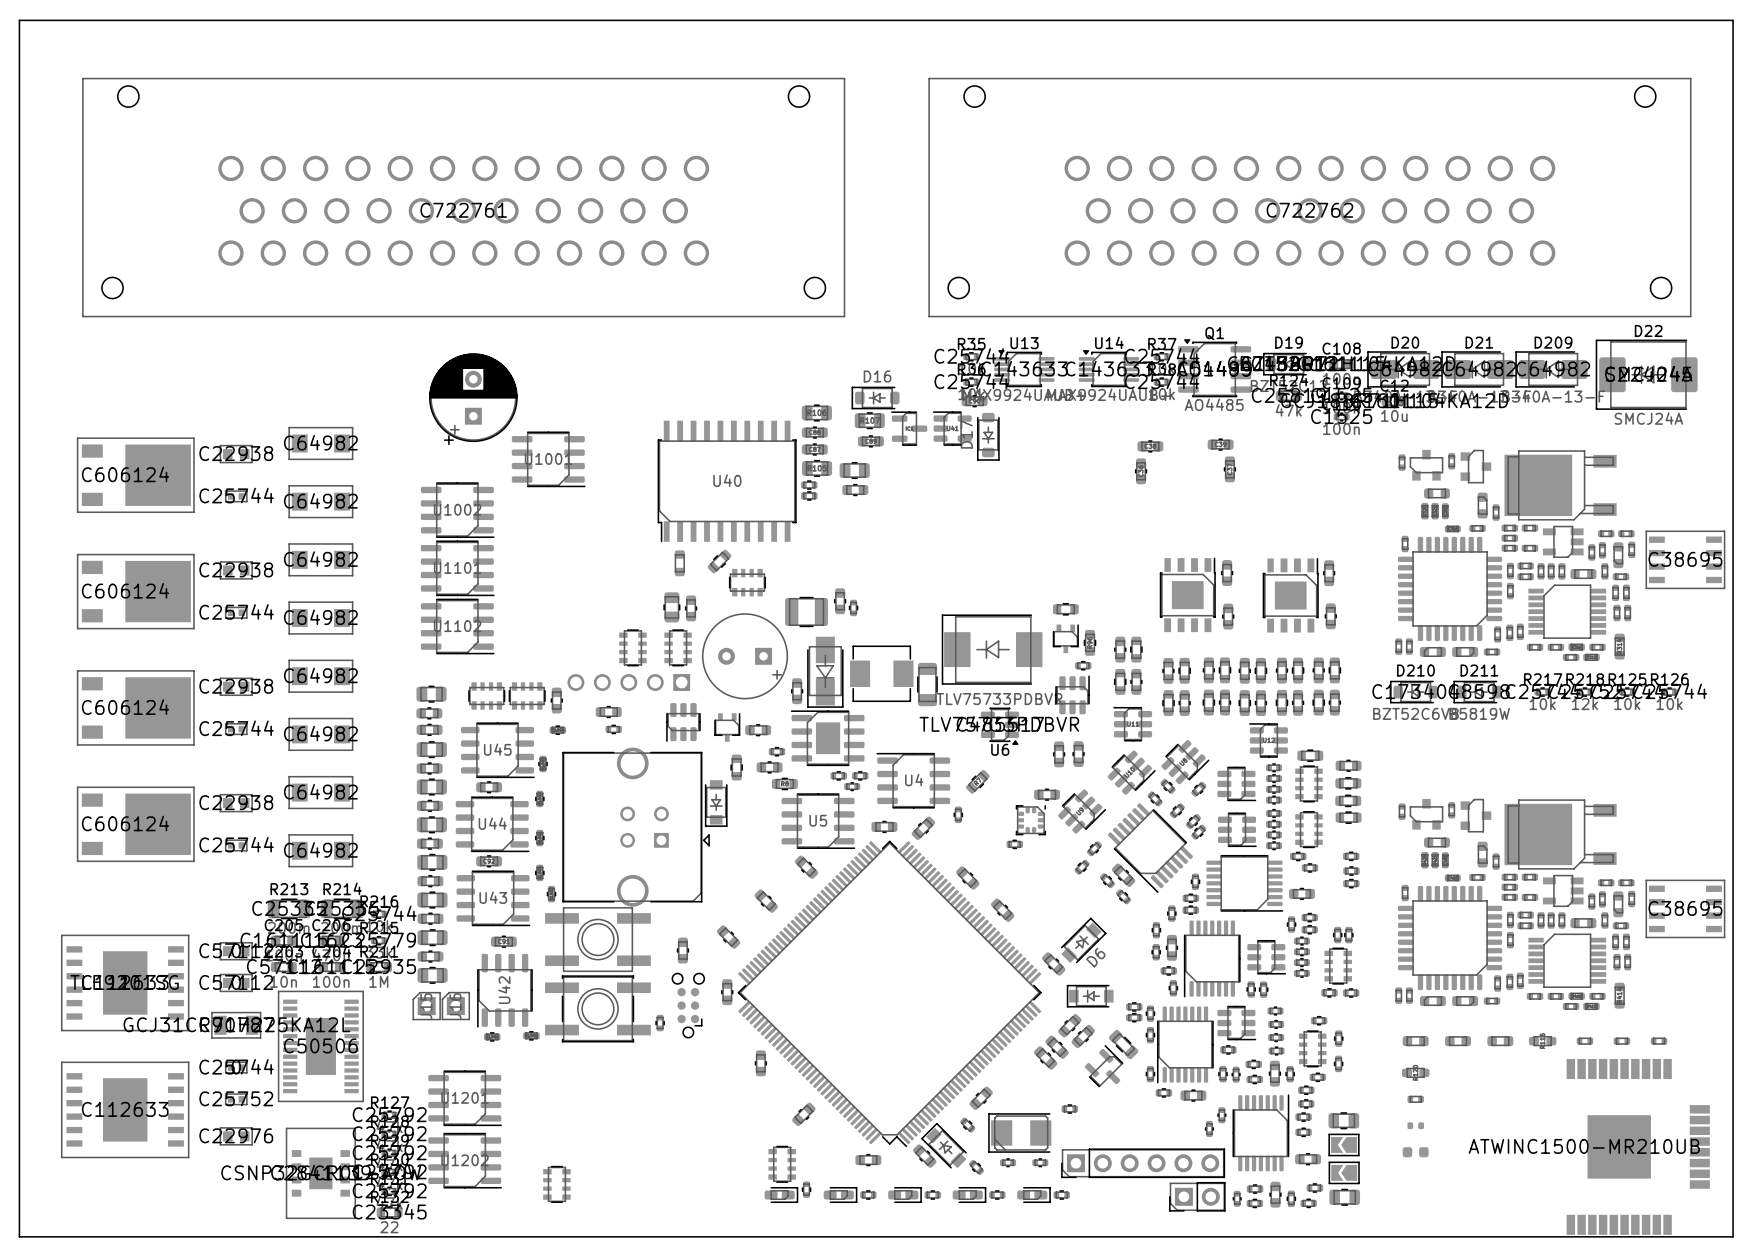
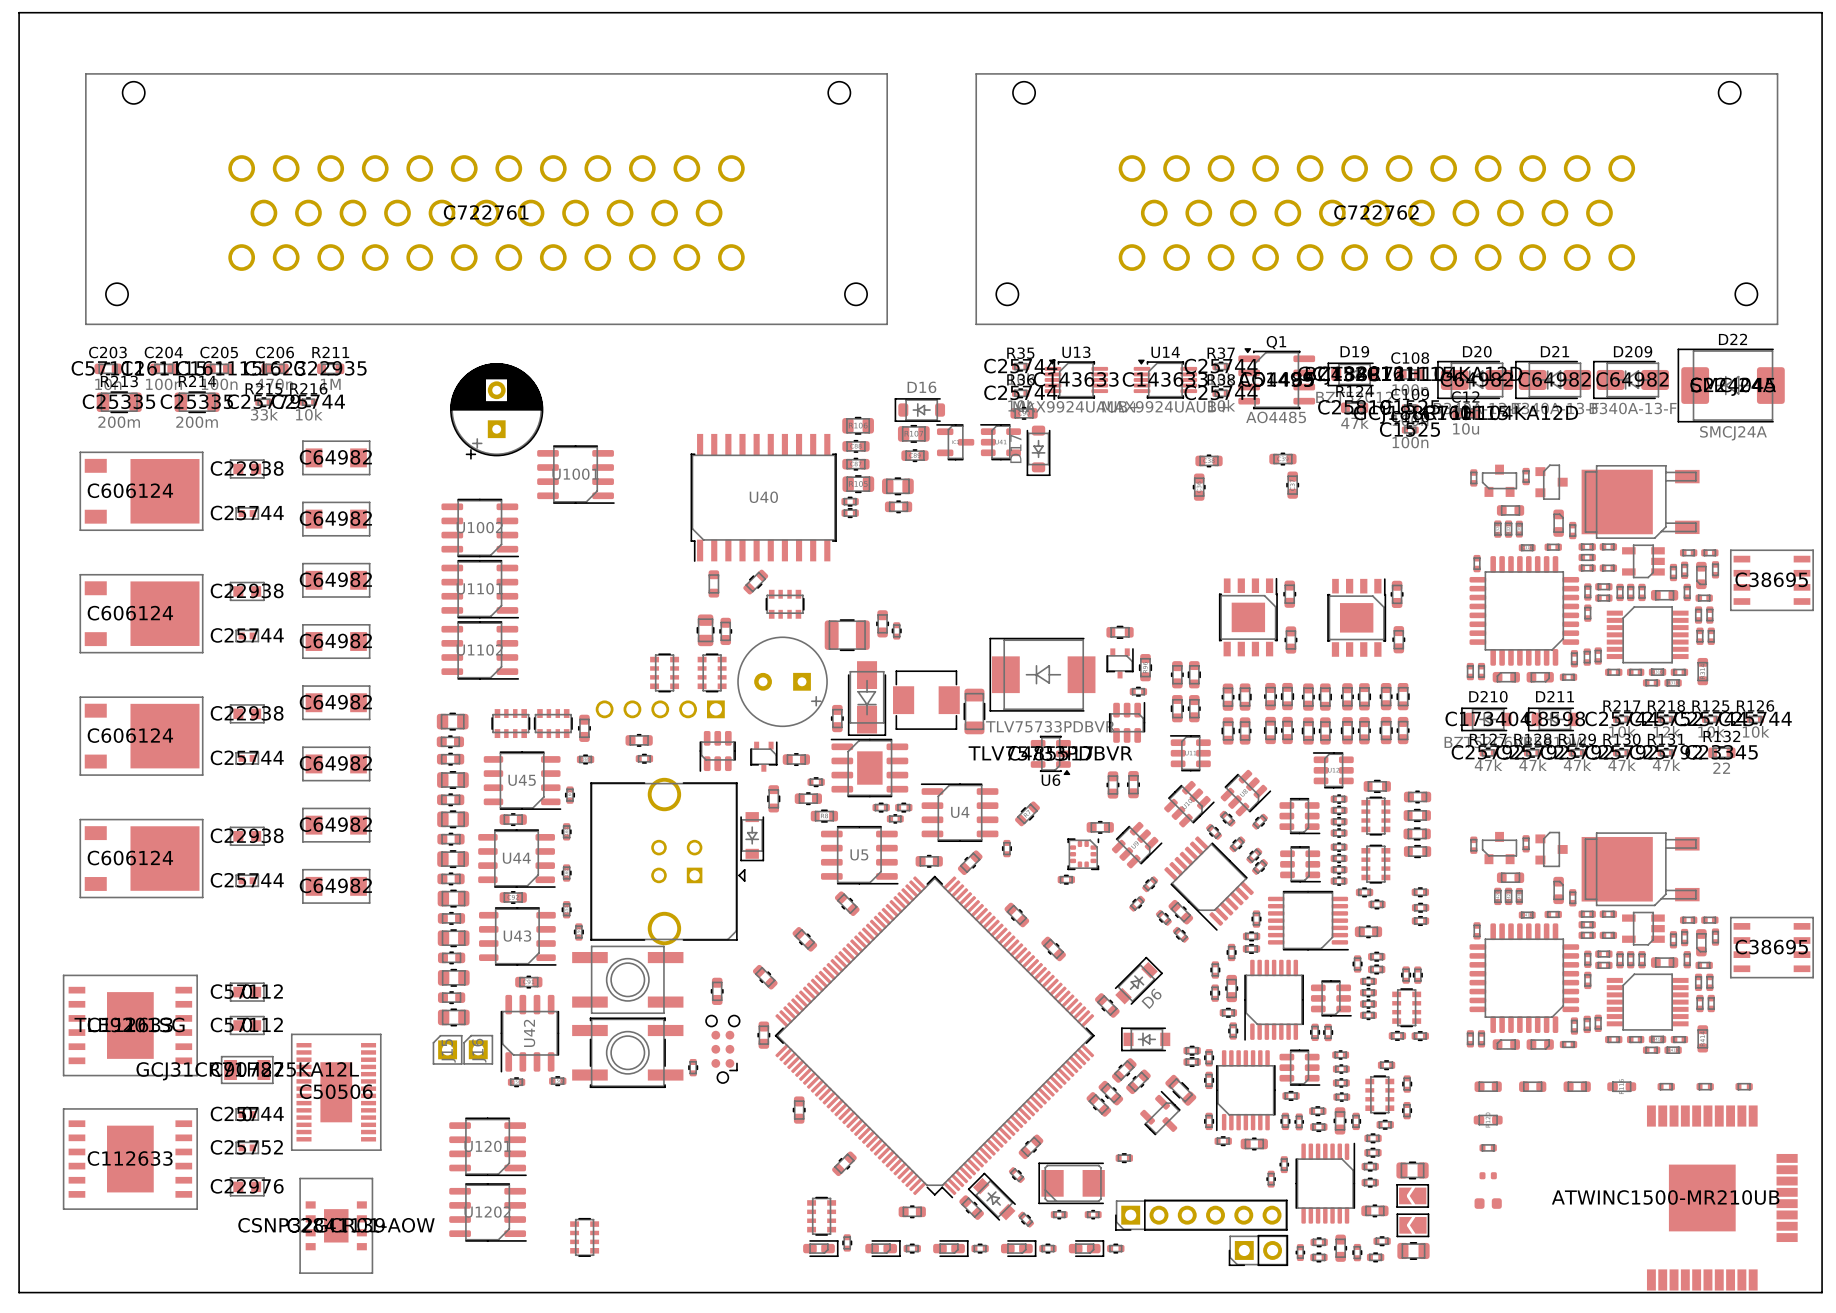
R213 position: (289, 908) -> (119, 402)
R214 position: (342, 908) -> (197, 402)
R216 position: (379, 914) -> (308, 402)
C205 position: (283, 940) -> (219, 368)
C206 position: (331, 940) -> (275, 368)
R215 position: (379, 940) -> (263, 402)
C203 position: (283, 967) -> (108, 368)
C204 position: (331, 967) -> (163, 368)
R211 position: (379, 967) -> (330, 368)
R127 position: (389, 1115) -> (1488, 752)
R128 position: (389, 1134) -> (1532, 752)
R129 position: (389, 1153) -> (1577, 752)
R130 position: (389, 1172) -> (1621, 752)
R131 position: (389, 1191) -> (1666, 752)
R132 position: (389, 1212) -> (1721, 752)

